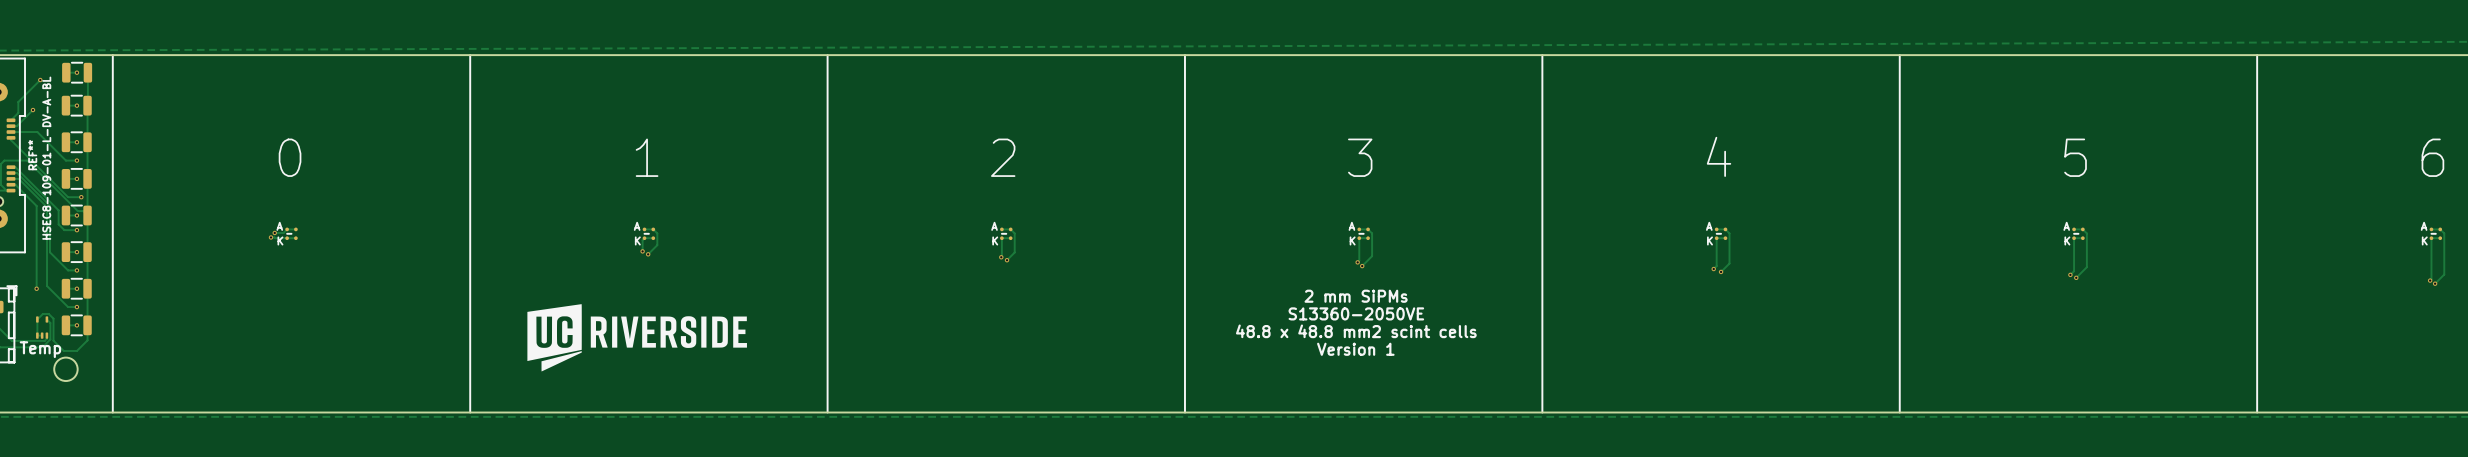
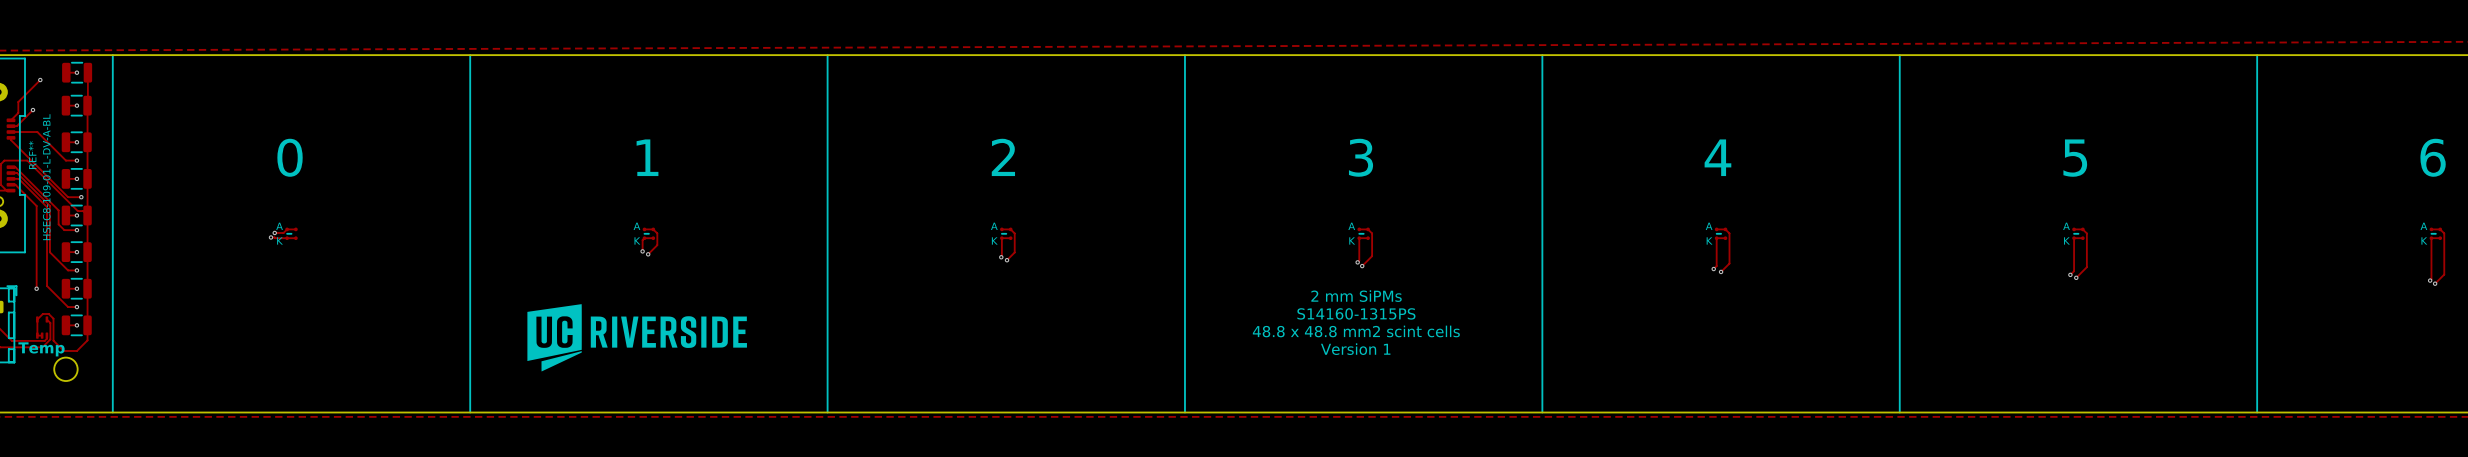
text: S13360-2050VE (1356, 313) -> S14160-1315PS (1356, 313)

